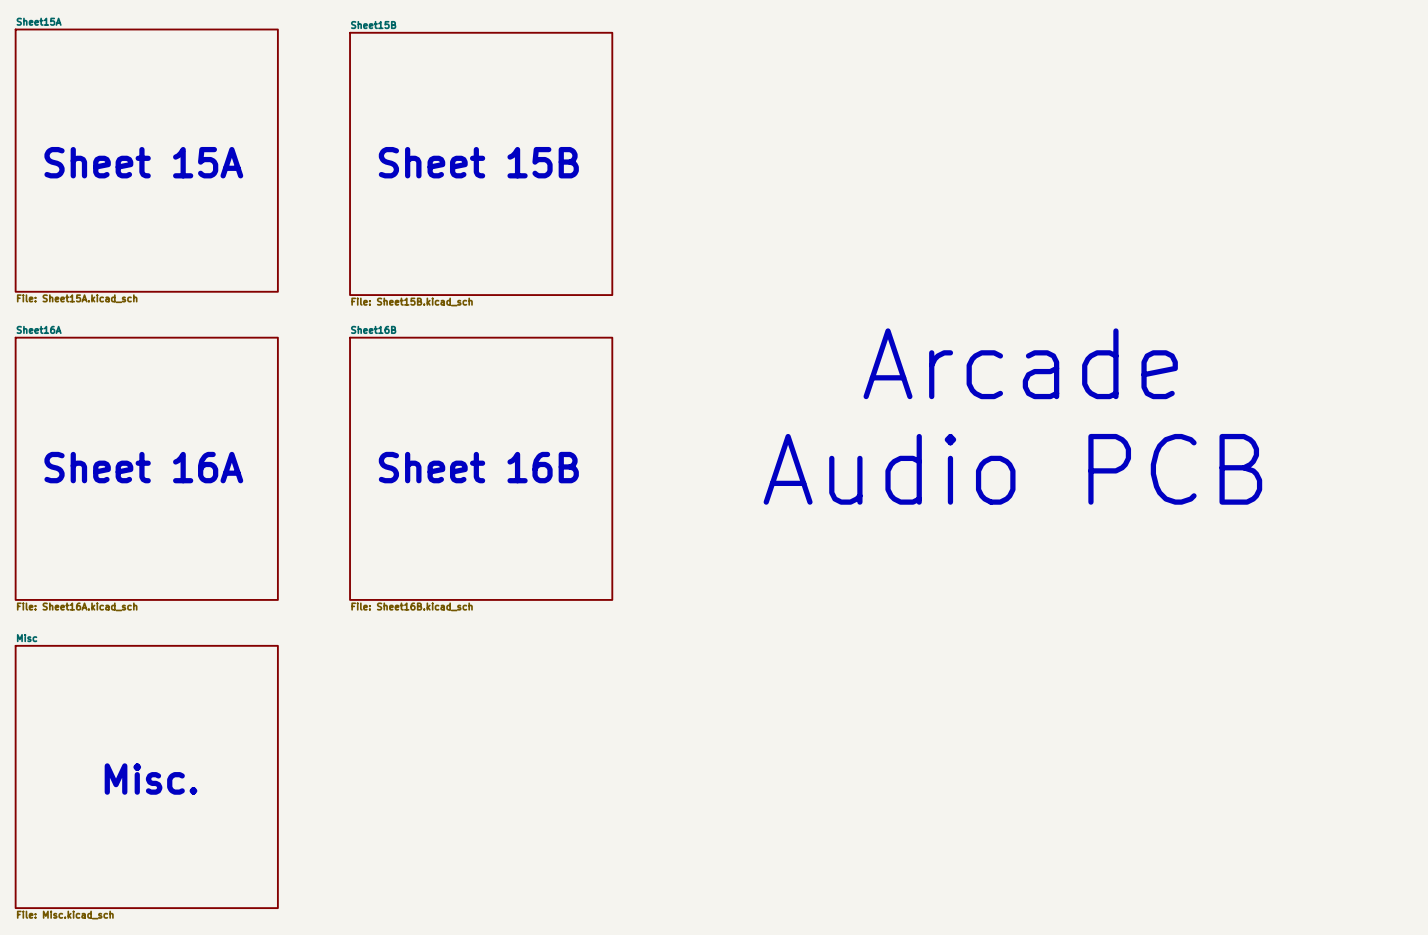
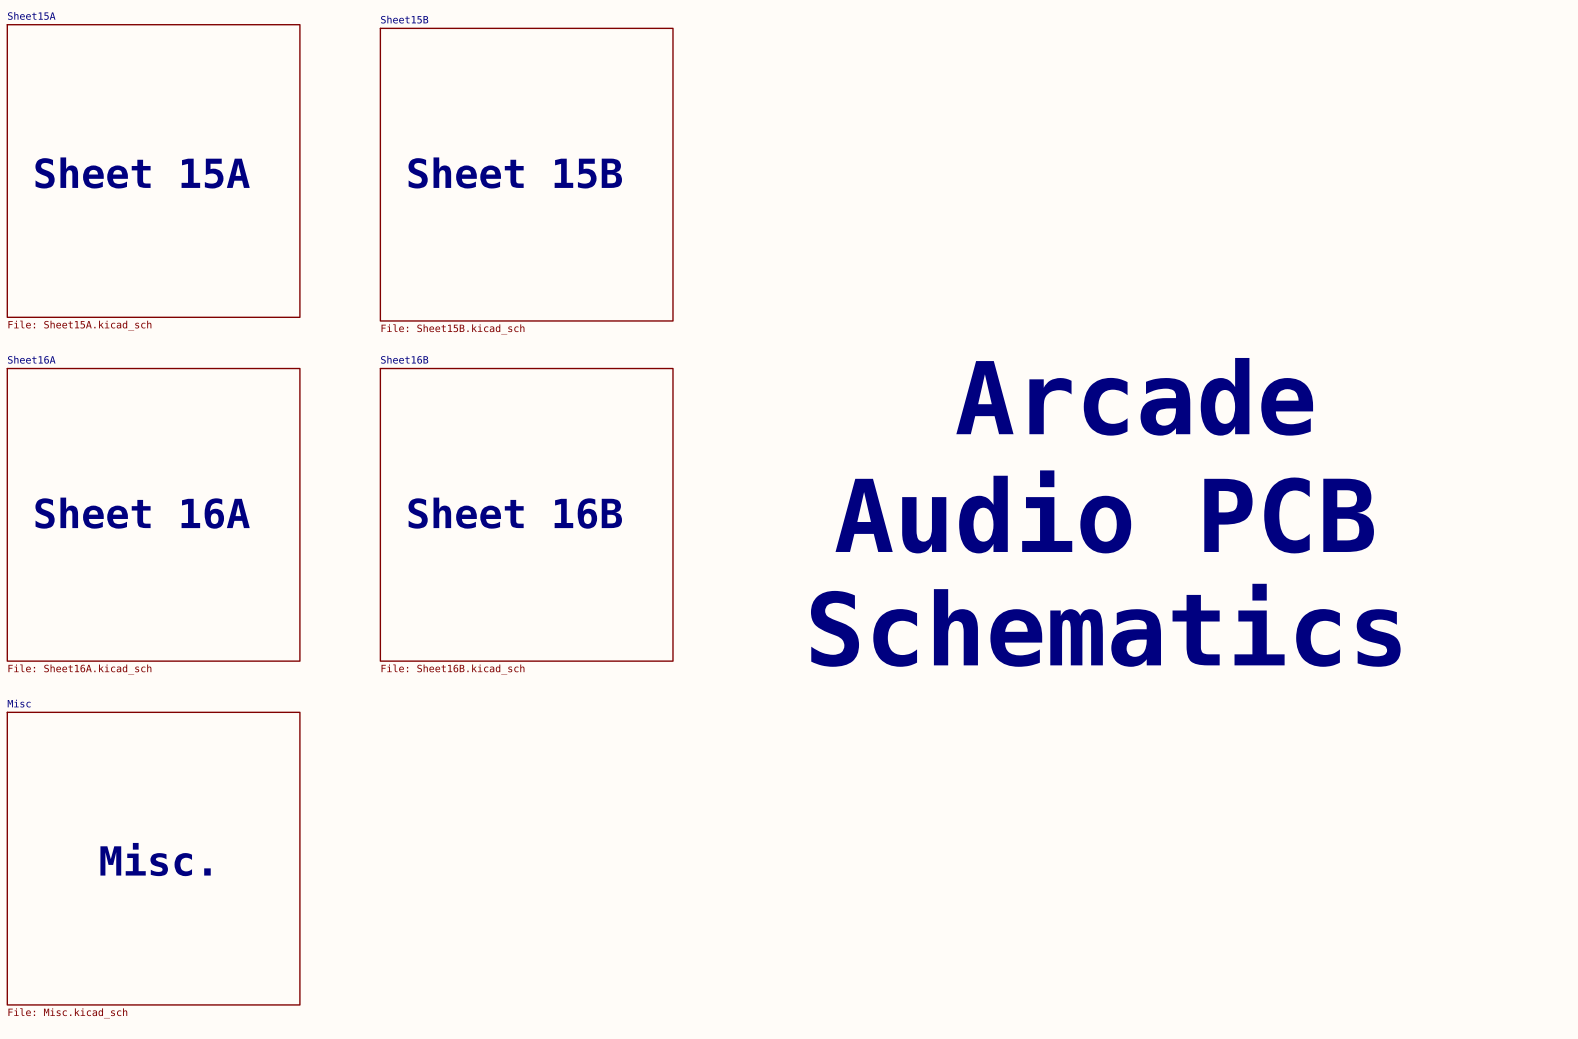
text: none -> Schematics (1105, 625)

